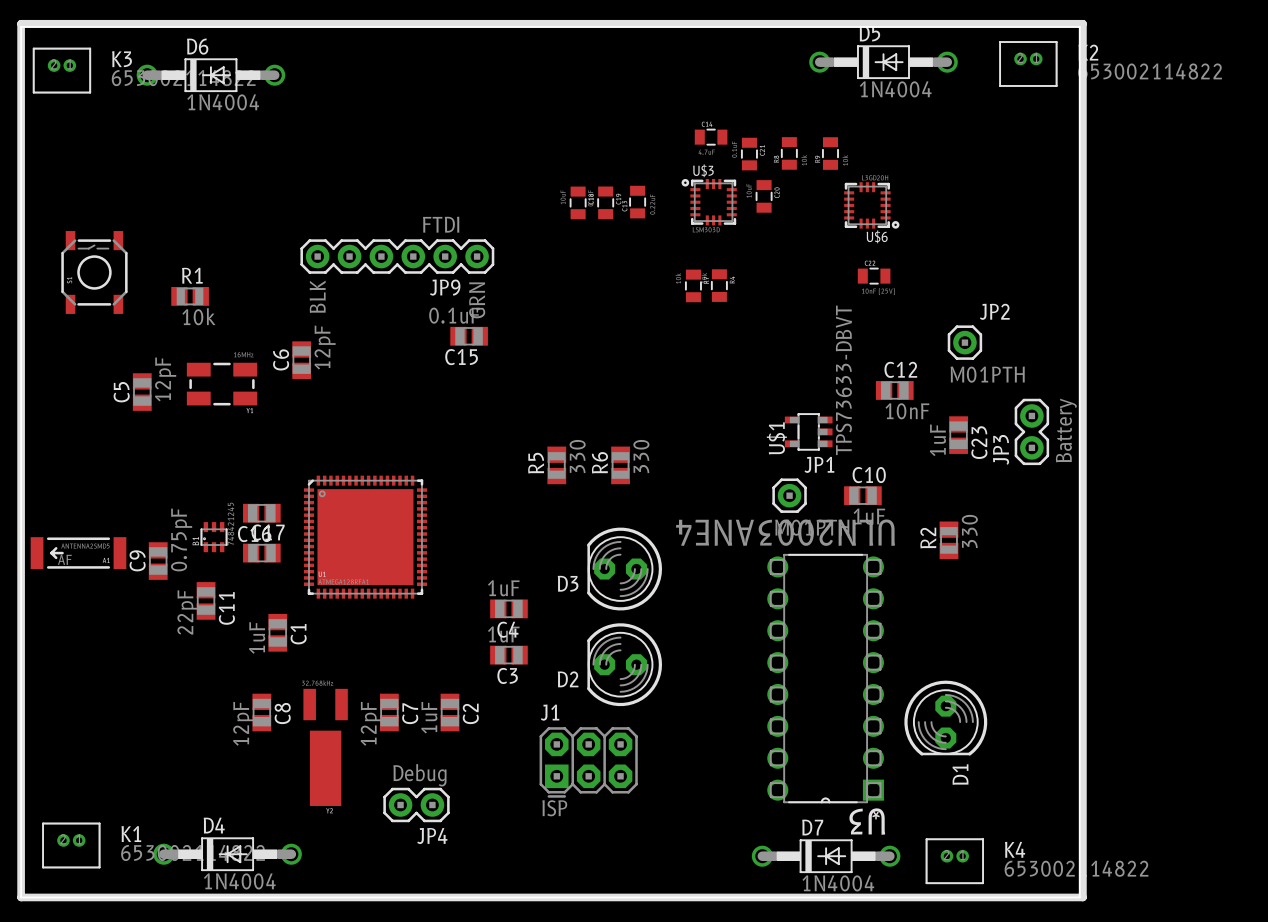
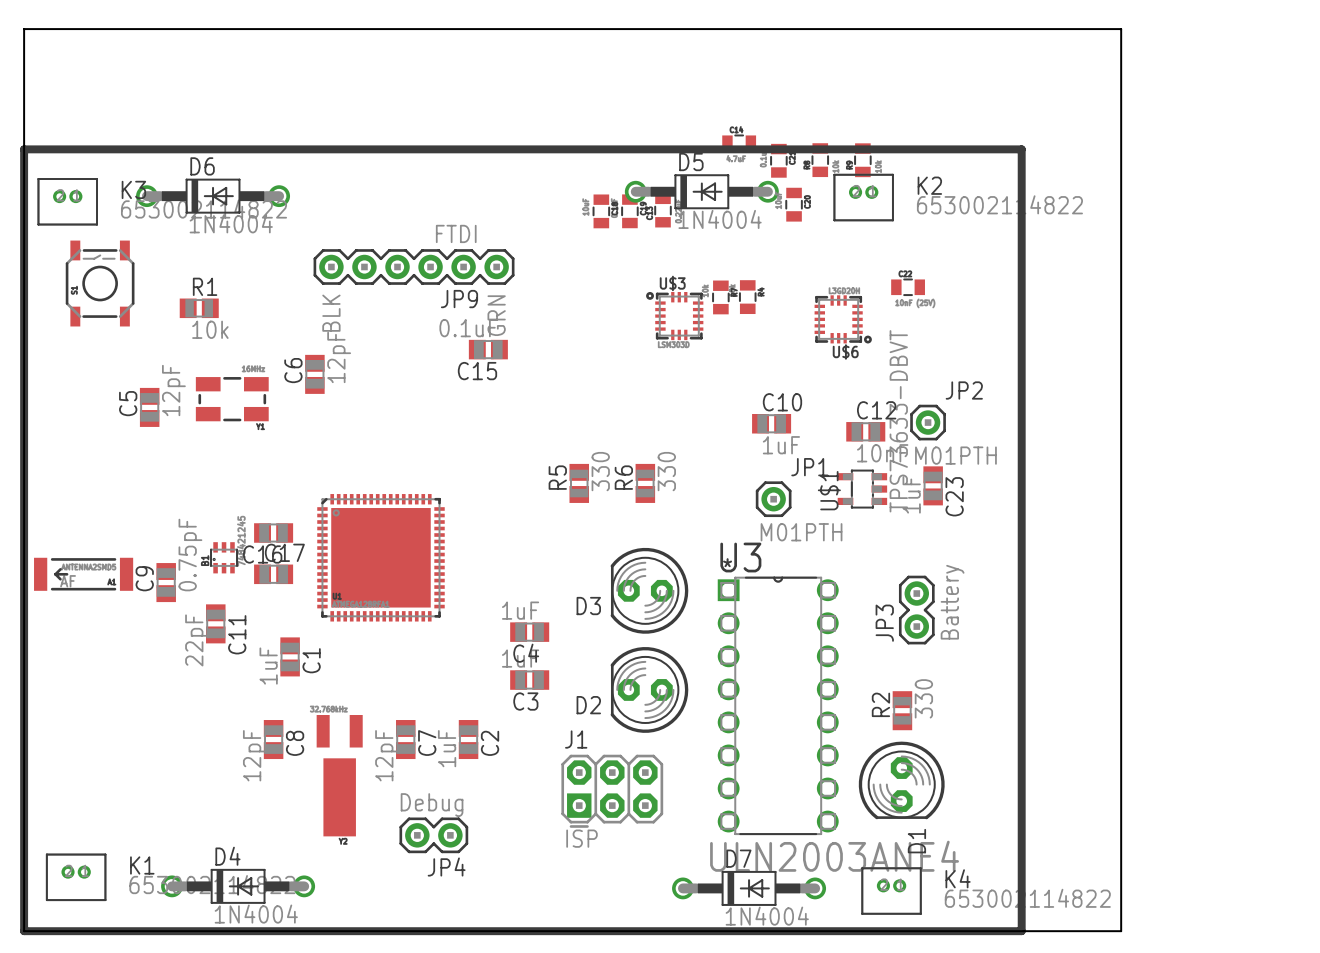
D5 position: (883, 62) -> (701, 191)
K2 position: (1028, 64) -> (863, 197)
K3 position: (61, 70) -> (67, 201)
D6 position: (210, 75) -> (213, 196)
line: (21, 143) (21, 23) (1082, 23) (1082, 897) (983, 897) -> (24, 149) (1021, 149) (1021, 931)
U$3 position: (709, 202) -> (674, 316)
U$6 position: (871, 205) -> (843, 319)
JP2 position: (964, 342) -> (928, 422)
C12 position: (894, 390) -> (865, 431)
U$1 position: (808, 431) -> (862, 489)
JP3 position: (1031, 431) -> (916, 610)
C23 position: (958, 435) -> (933, 485)
JP1 position: (789, 495) -> (773, 499)
C10 position: (862, 495) -> (771, 423)
R2 position: (948, 540) -> (902, 710)
U3 rotation: 0° (825, 678) -> 180° (778, 705)
D1 position: (945, 718) -> (901, 780)
D7 position: (826, 856) -> (749, 888)
K4 position: (954, 861) -> (891, 891)

